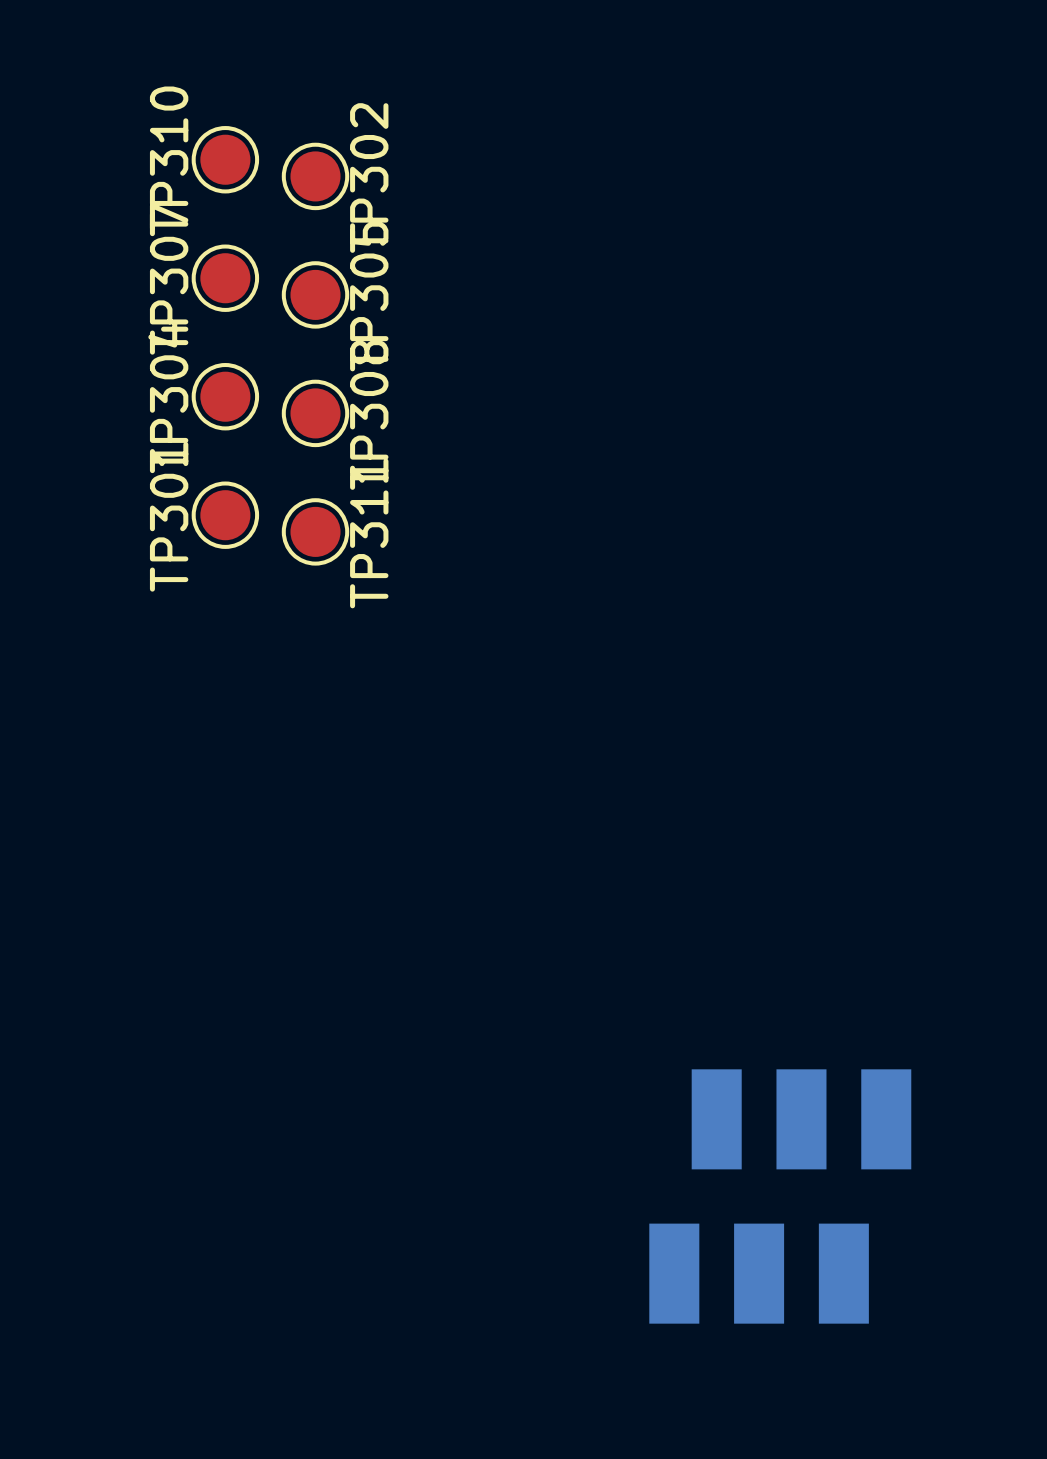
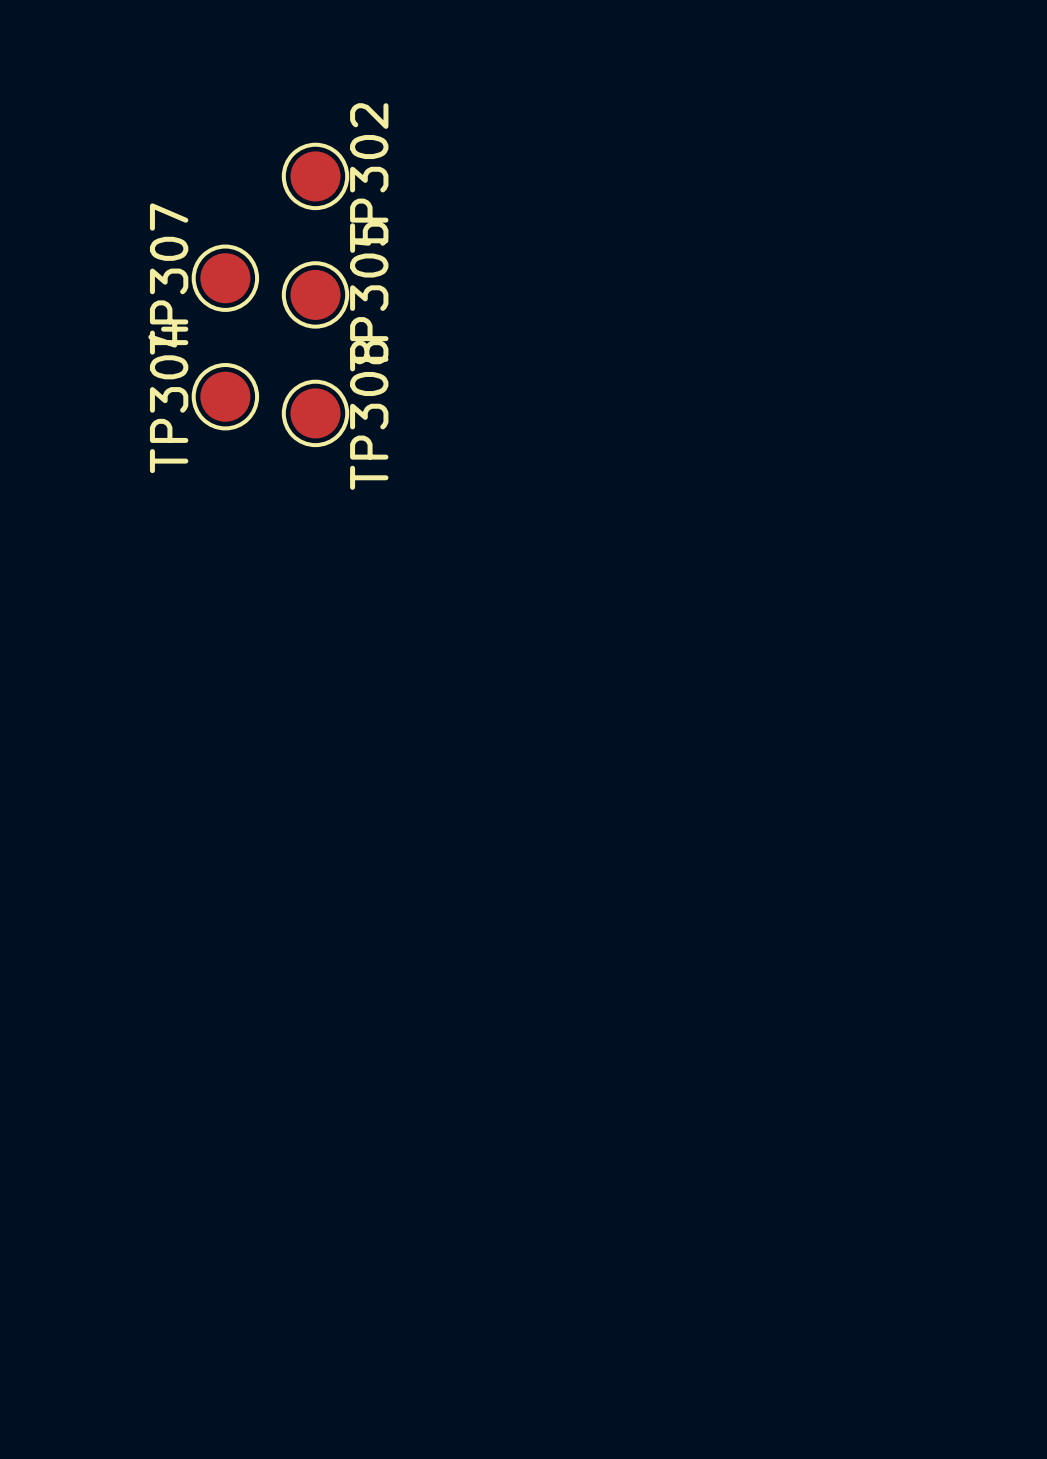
TP310: (225, 159) -> none
TP301: (225, 515) -> none
TP311: (315, 531) -> none
part: (780, 1196) -> none

